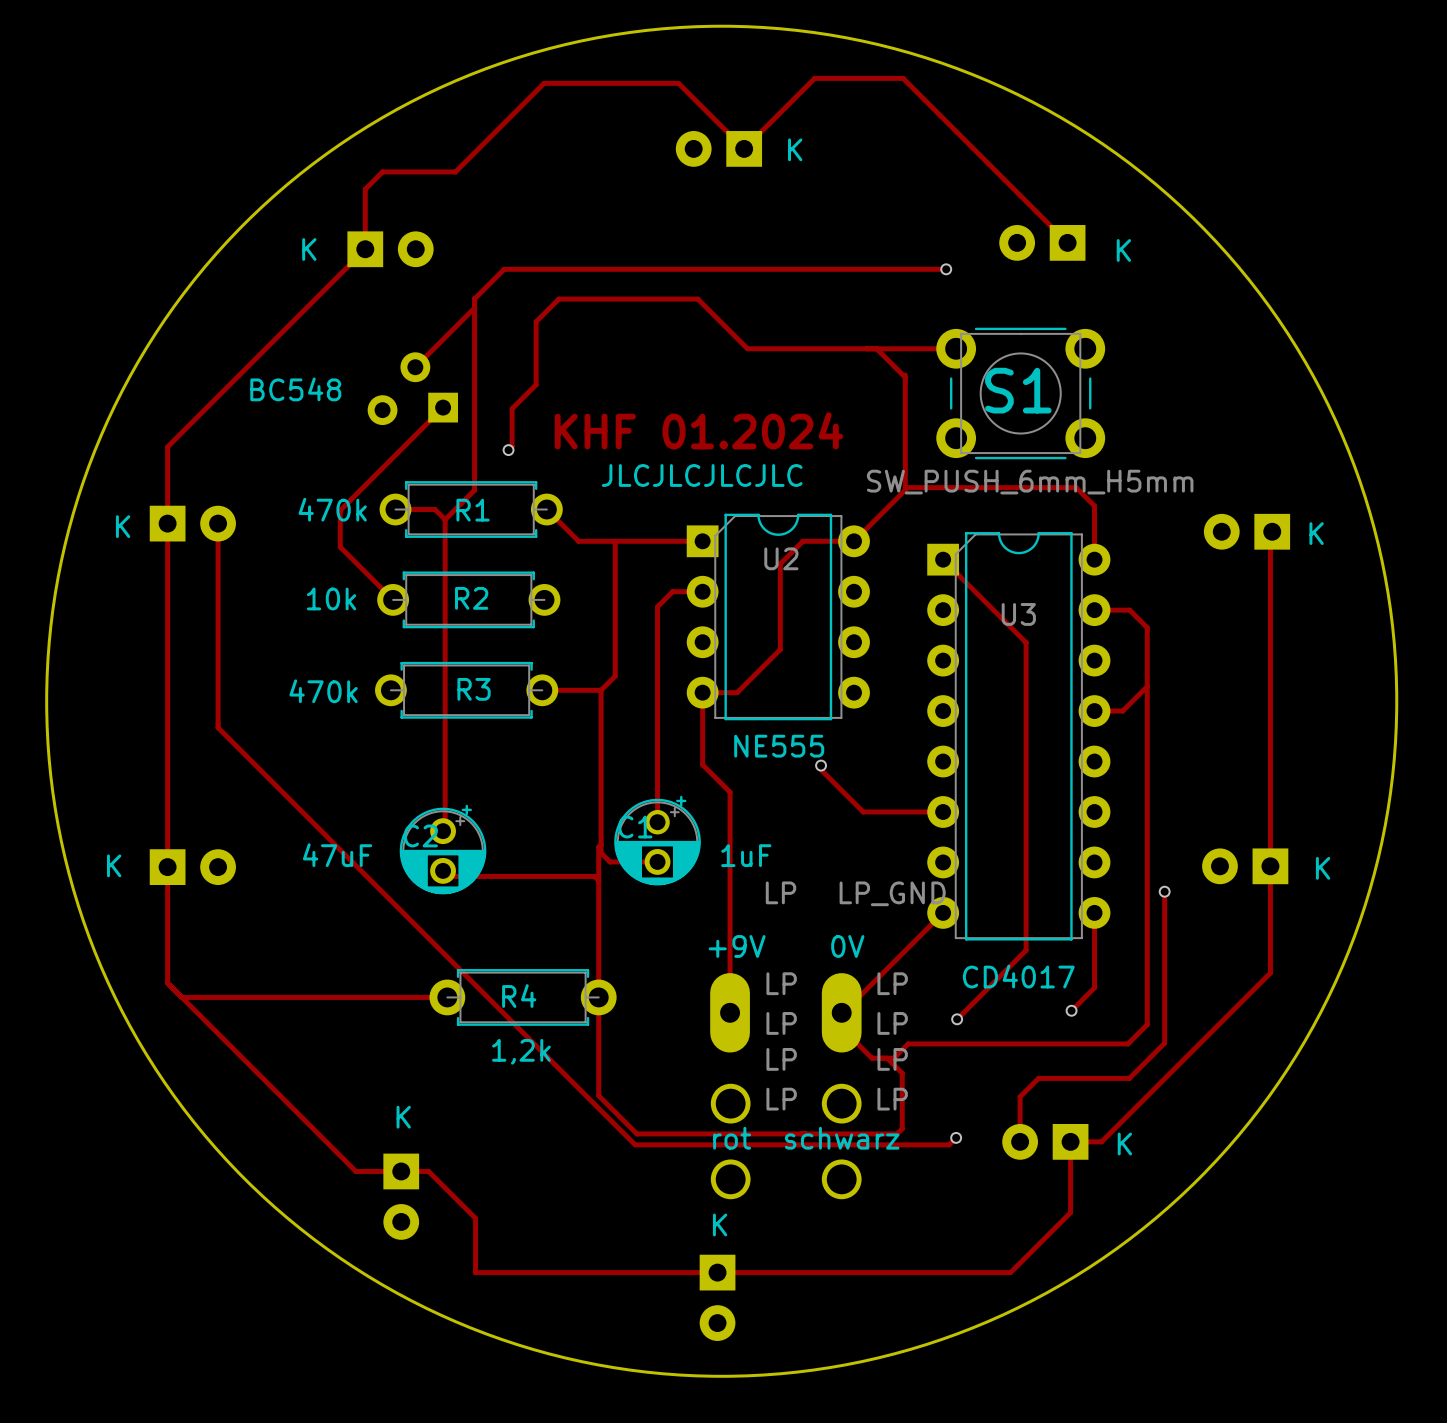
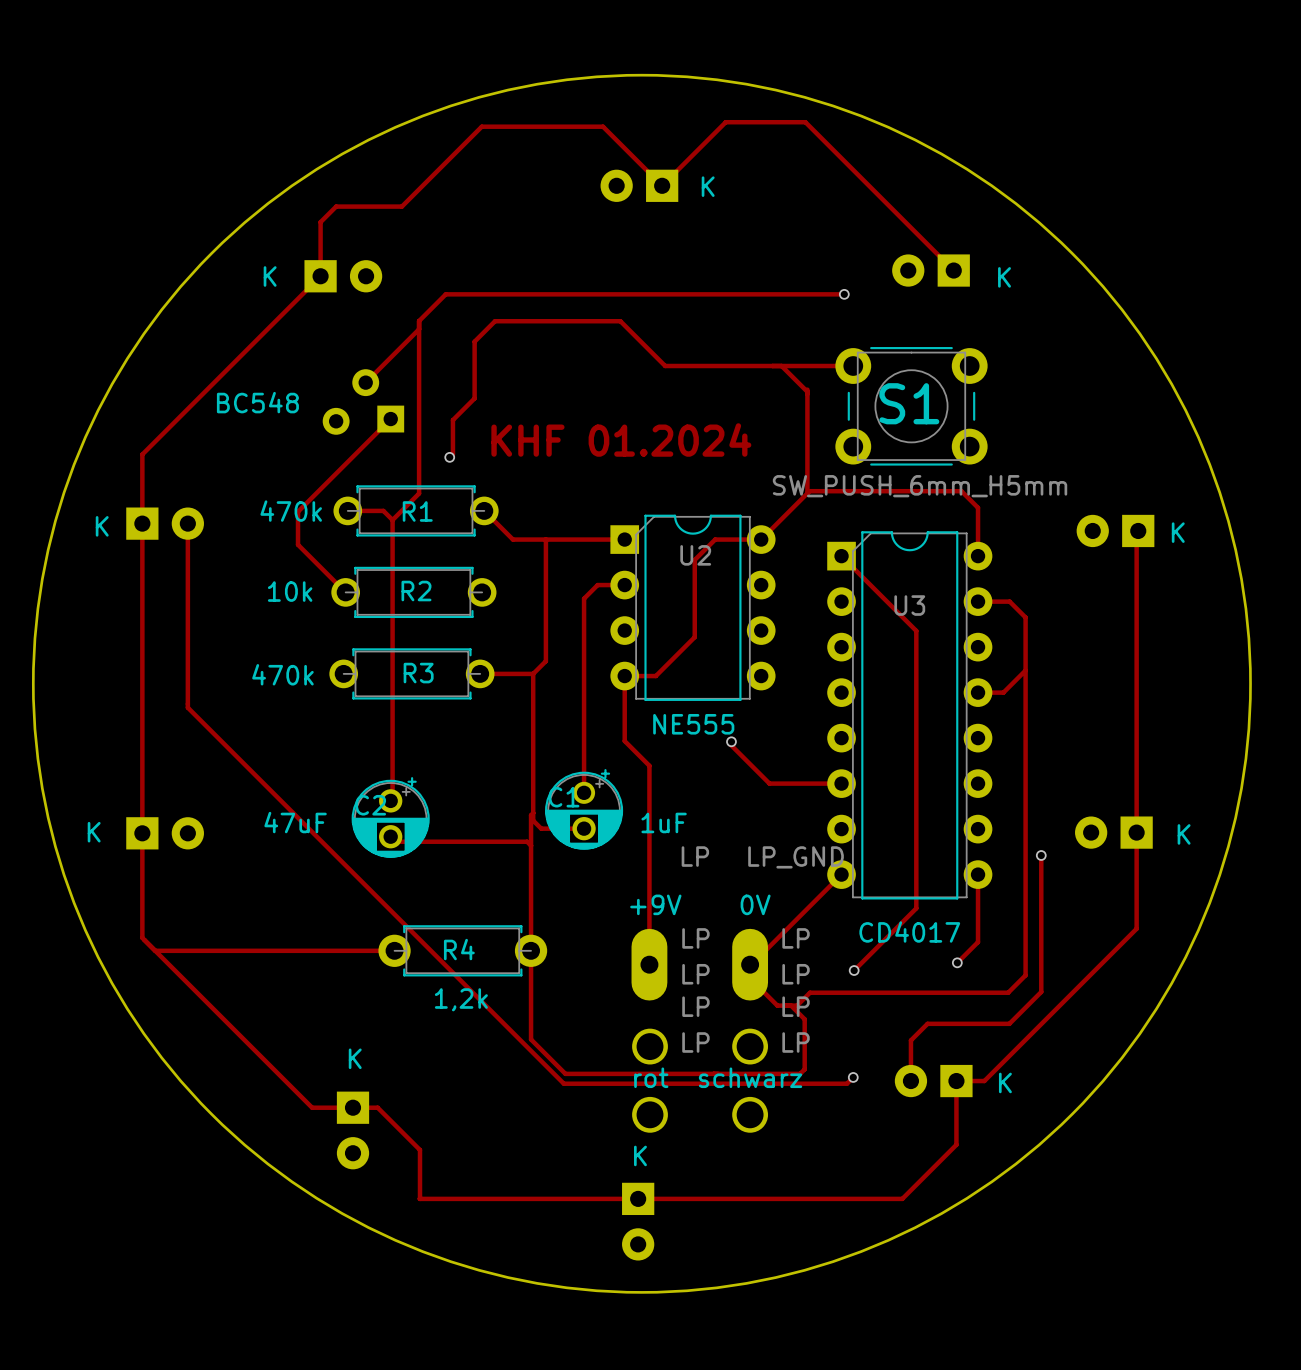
text: JLCJLCJLCJLC (702, 475) -> none

